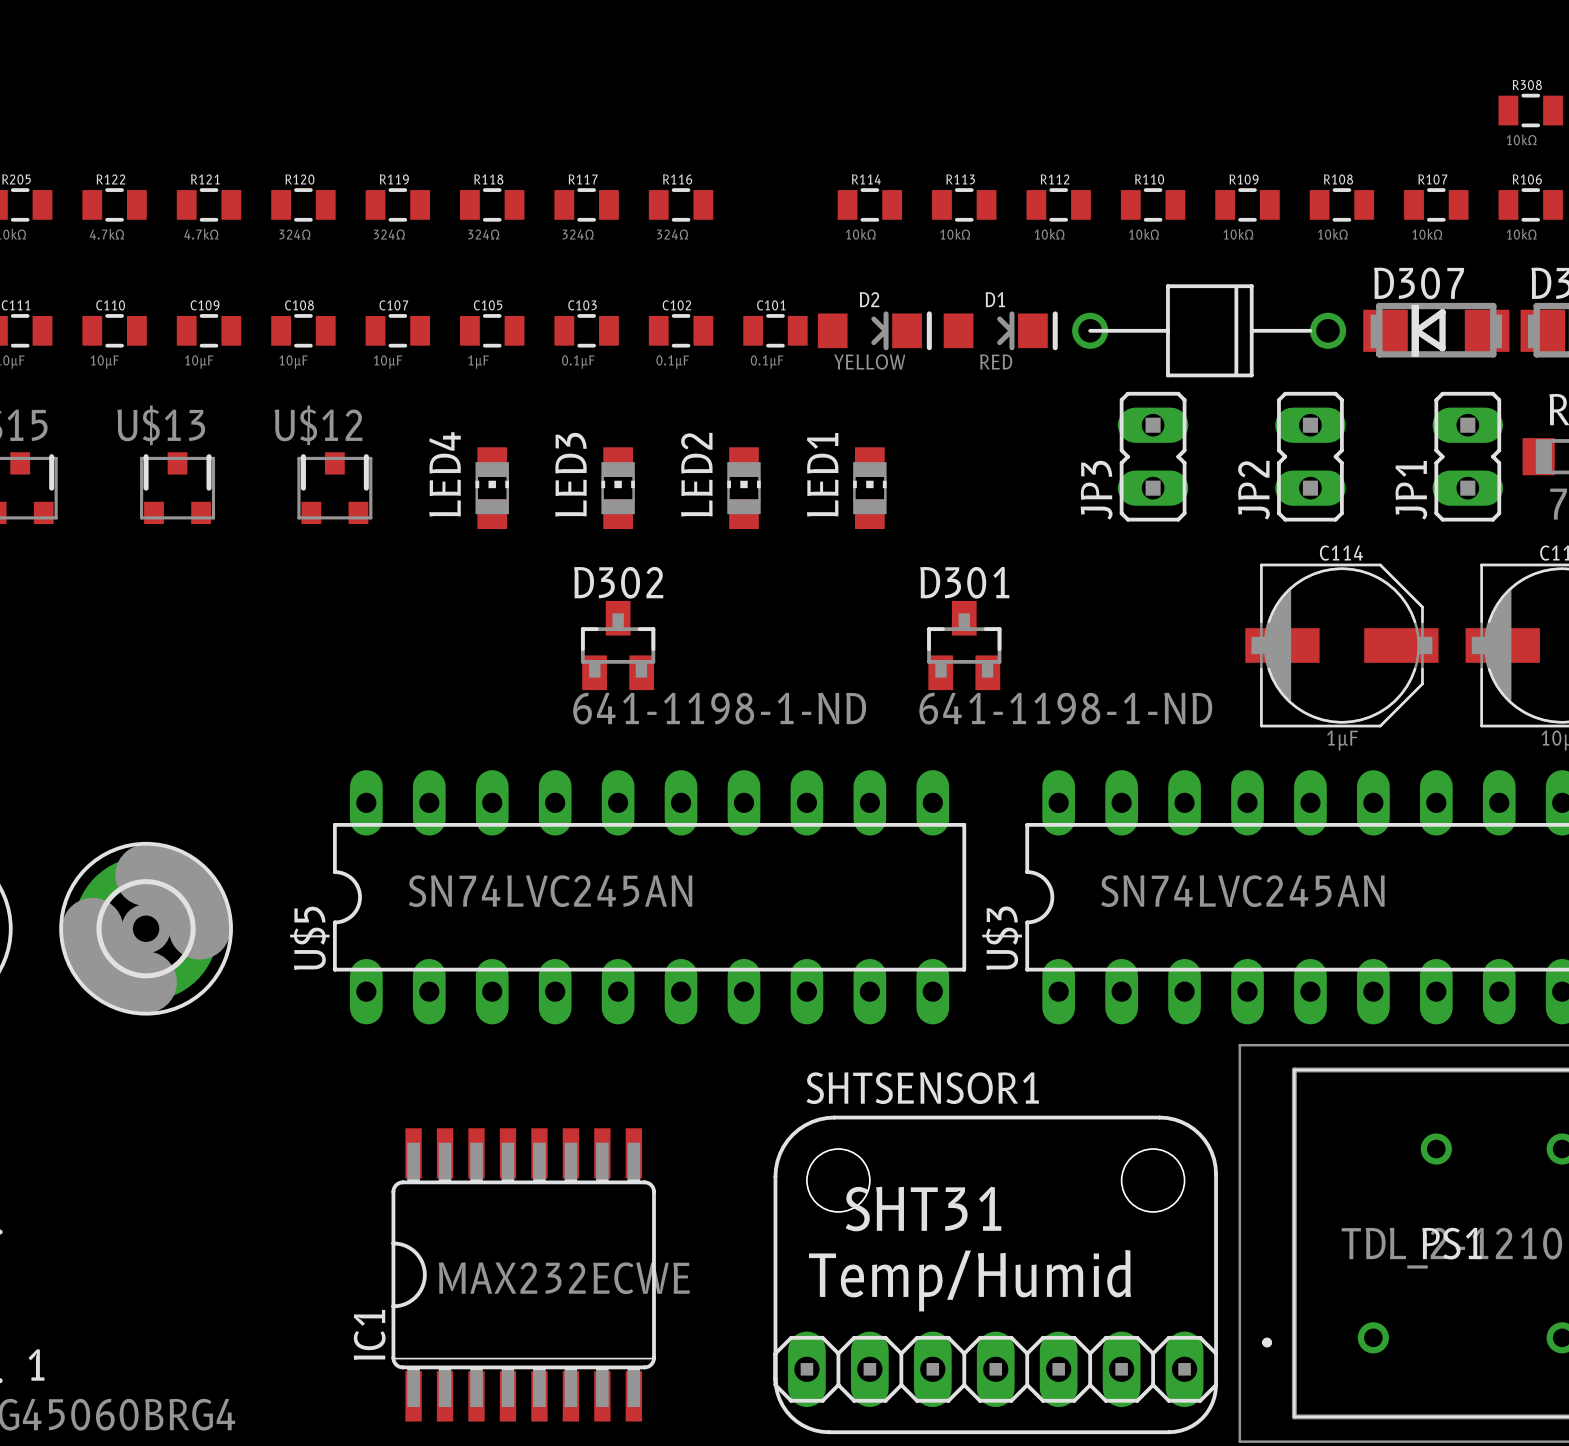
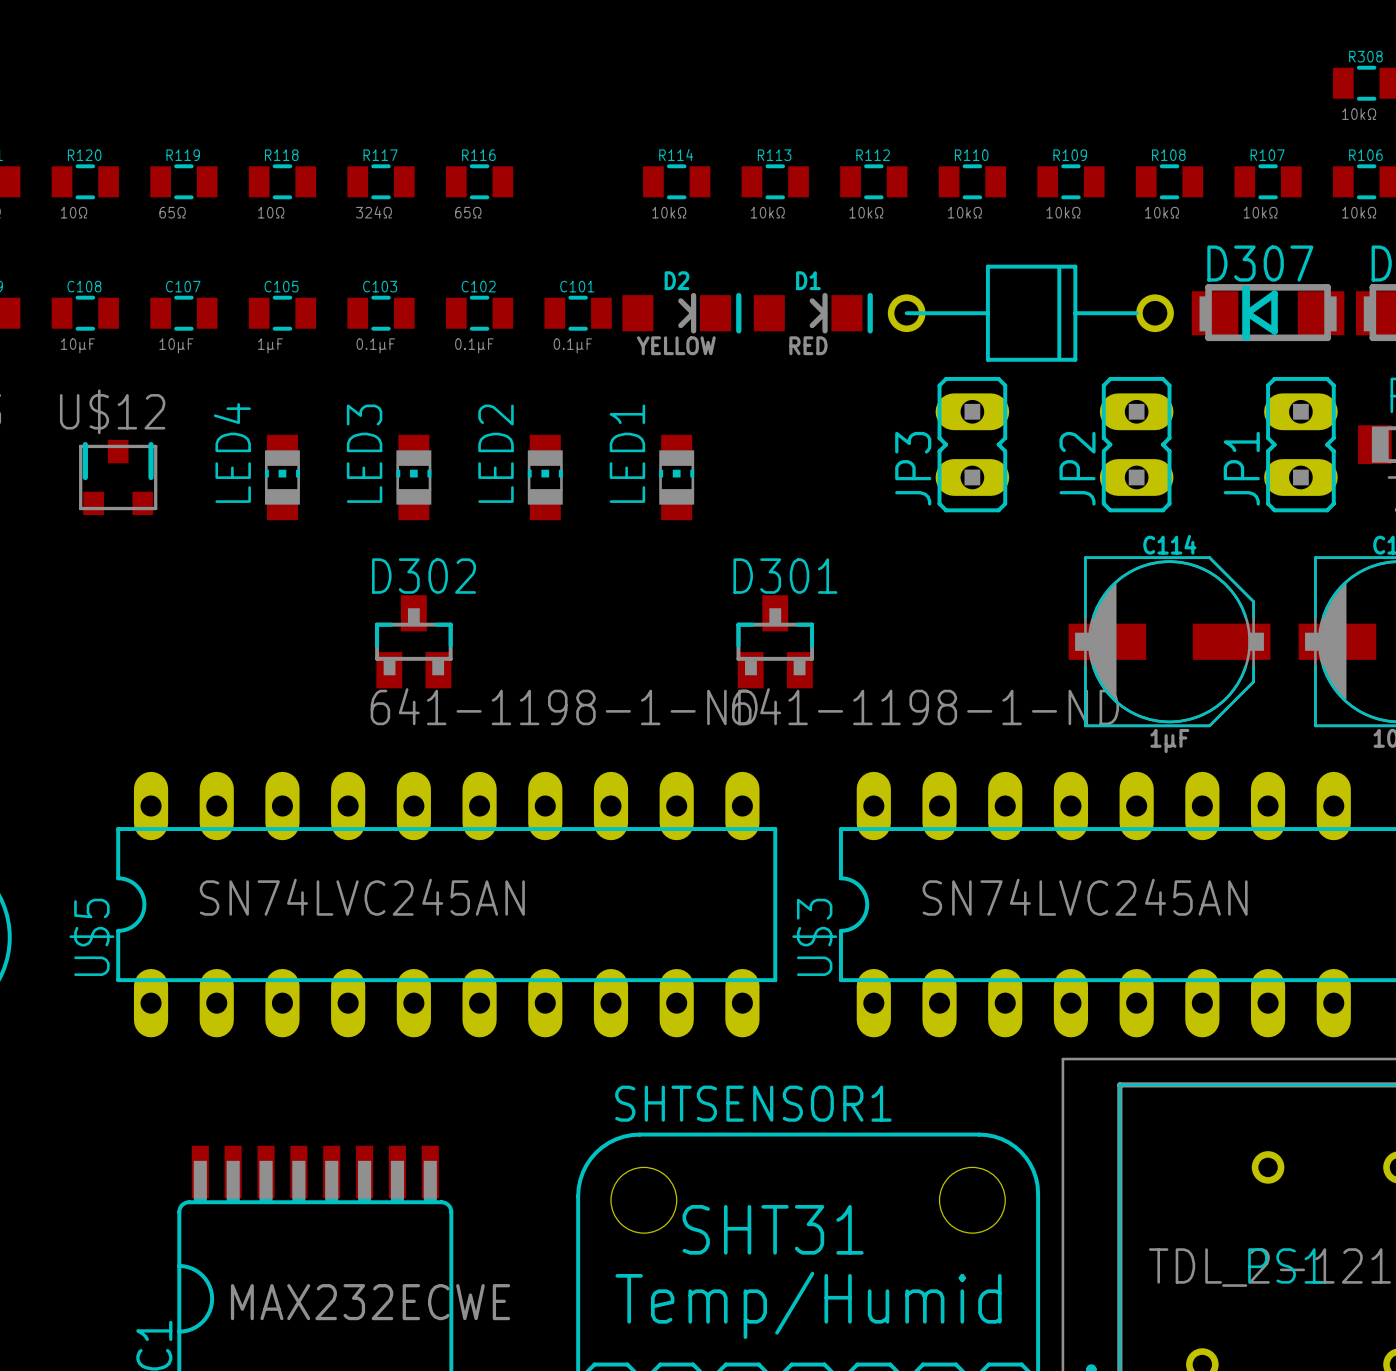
R120 value: 324Ω (294, 234) -> 10Ω (74, 212)
R119 value: 324Ω (389, 234) -> 65Ω (172, 212)
R118 value: 324Ω (483, 234) -> 10Ω (271, 212)
R116 value: 324Ω (672, 234) -> 65Ω (468, 212)

